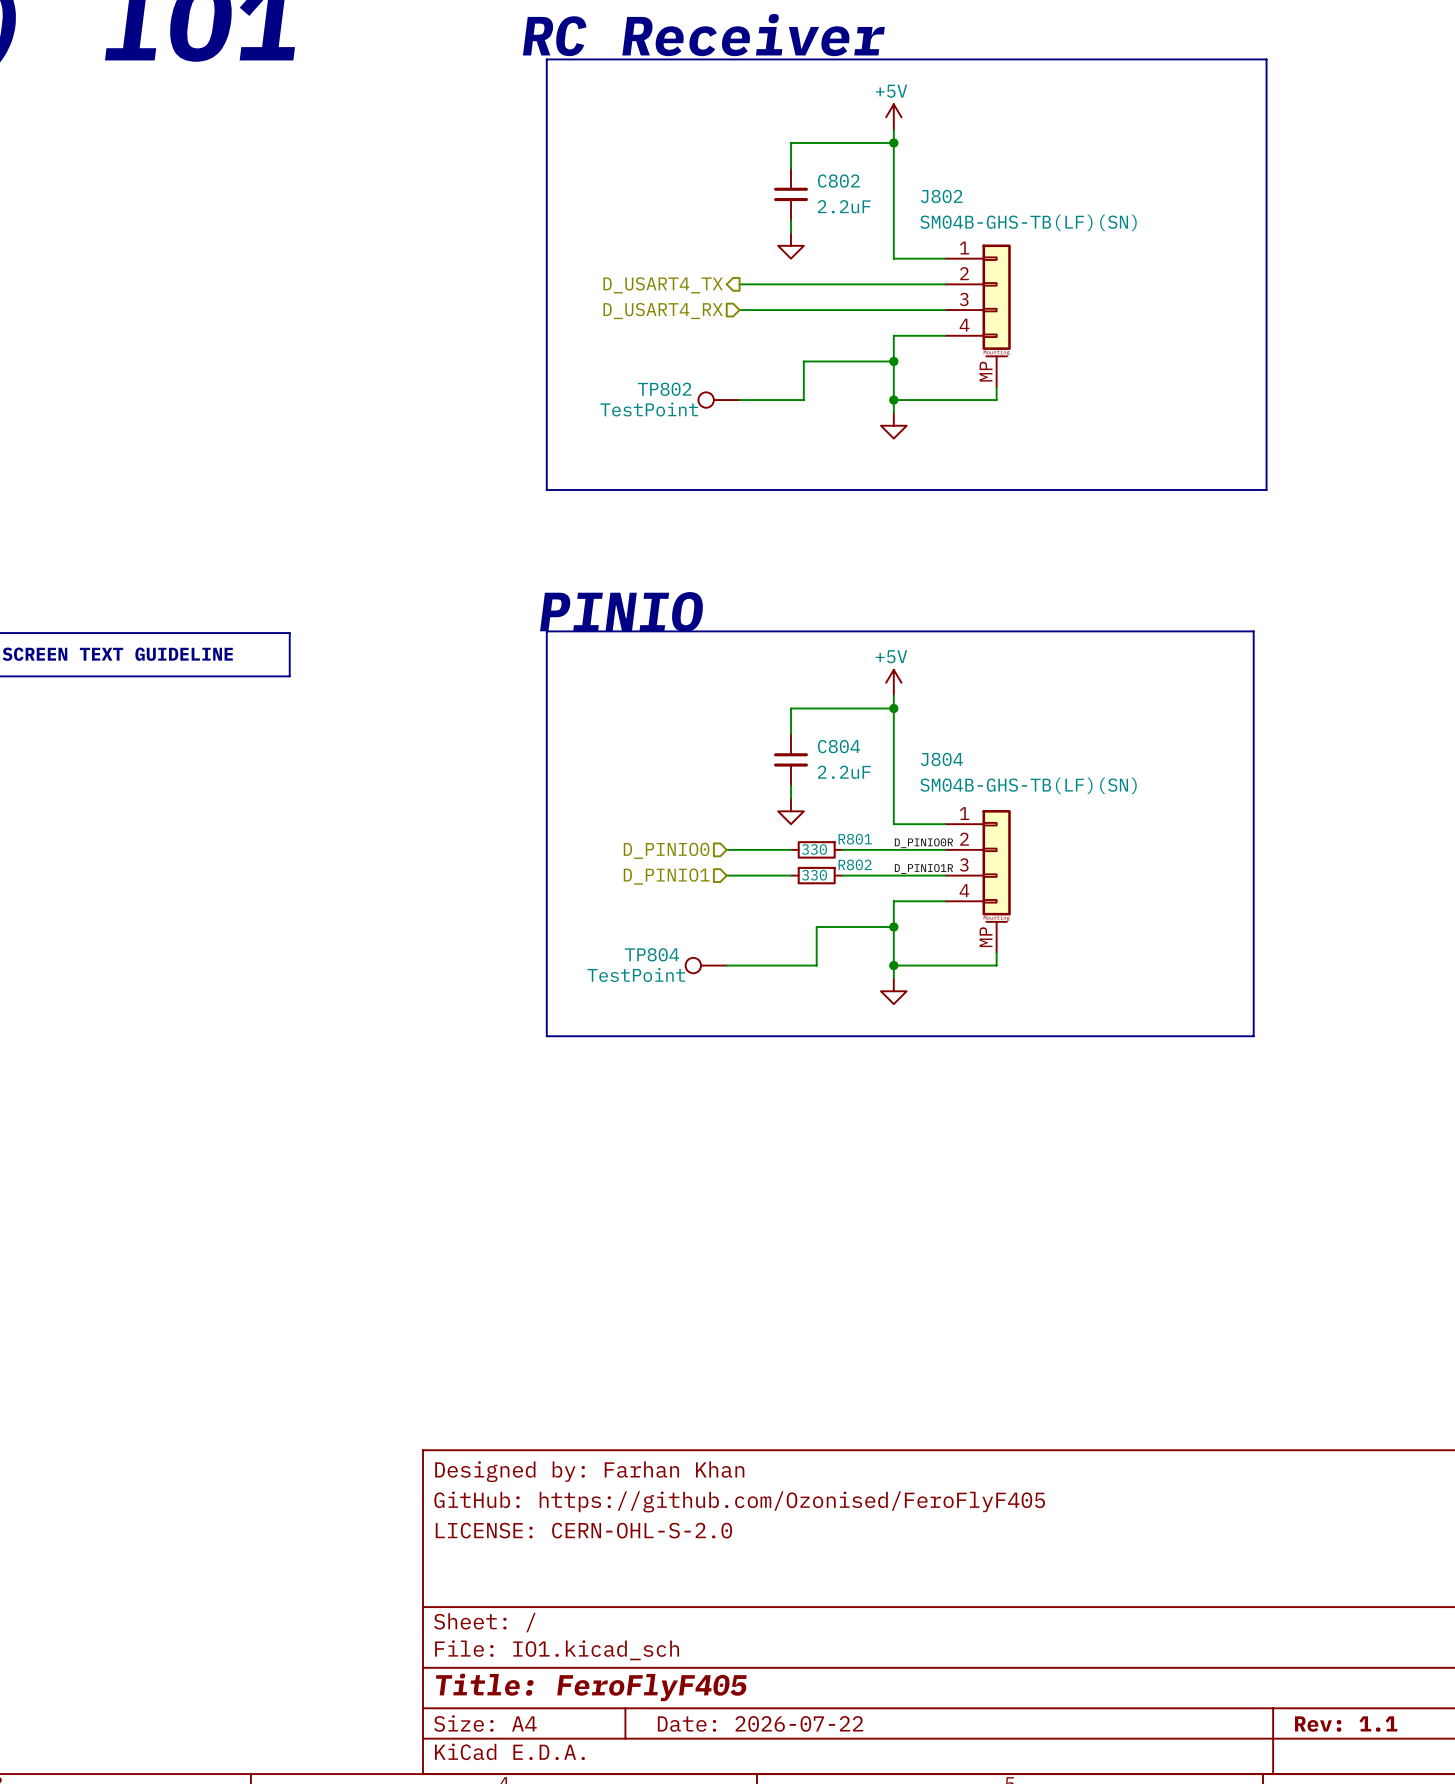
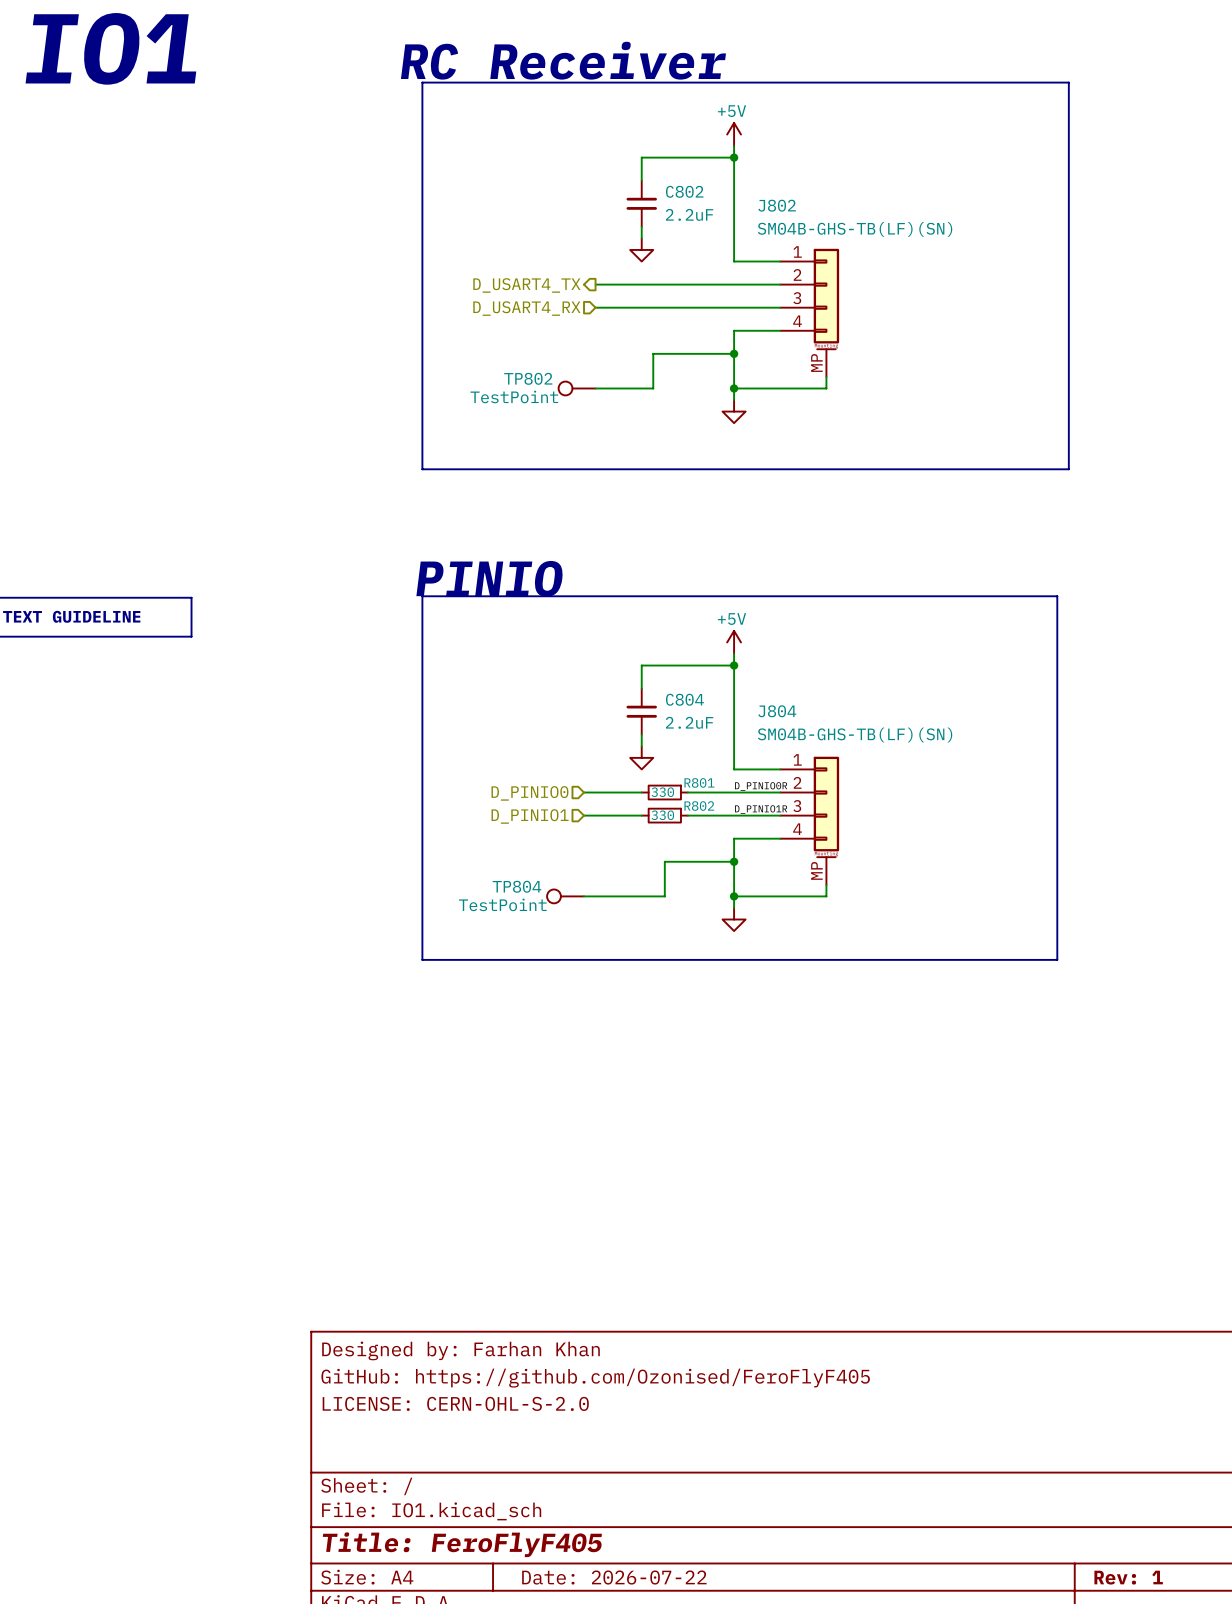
title block: Rev: 1.1 (1346, 1724) -> Rev: 1 (1128, 1577)

